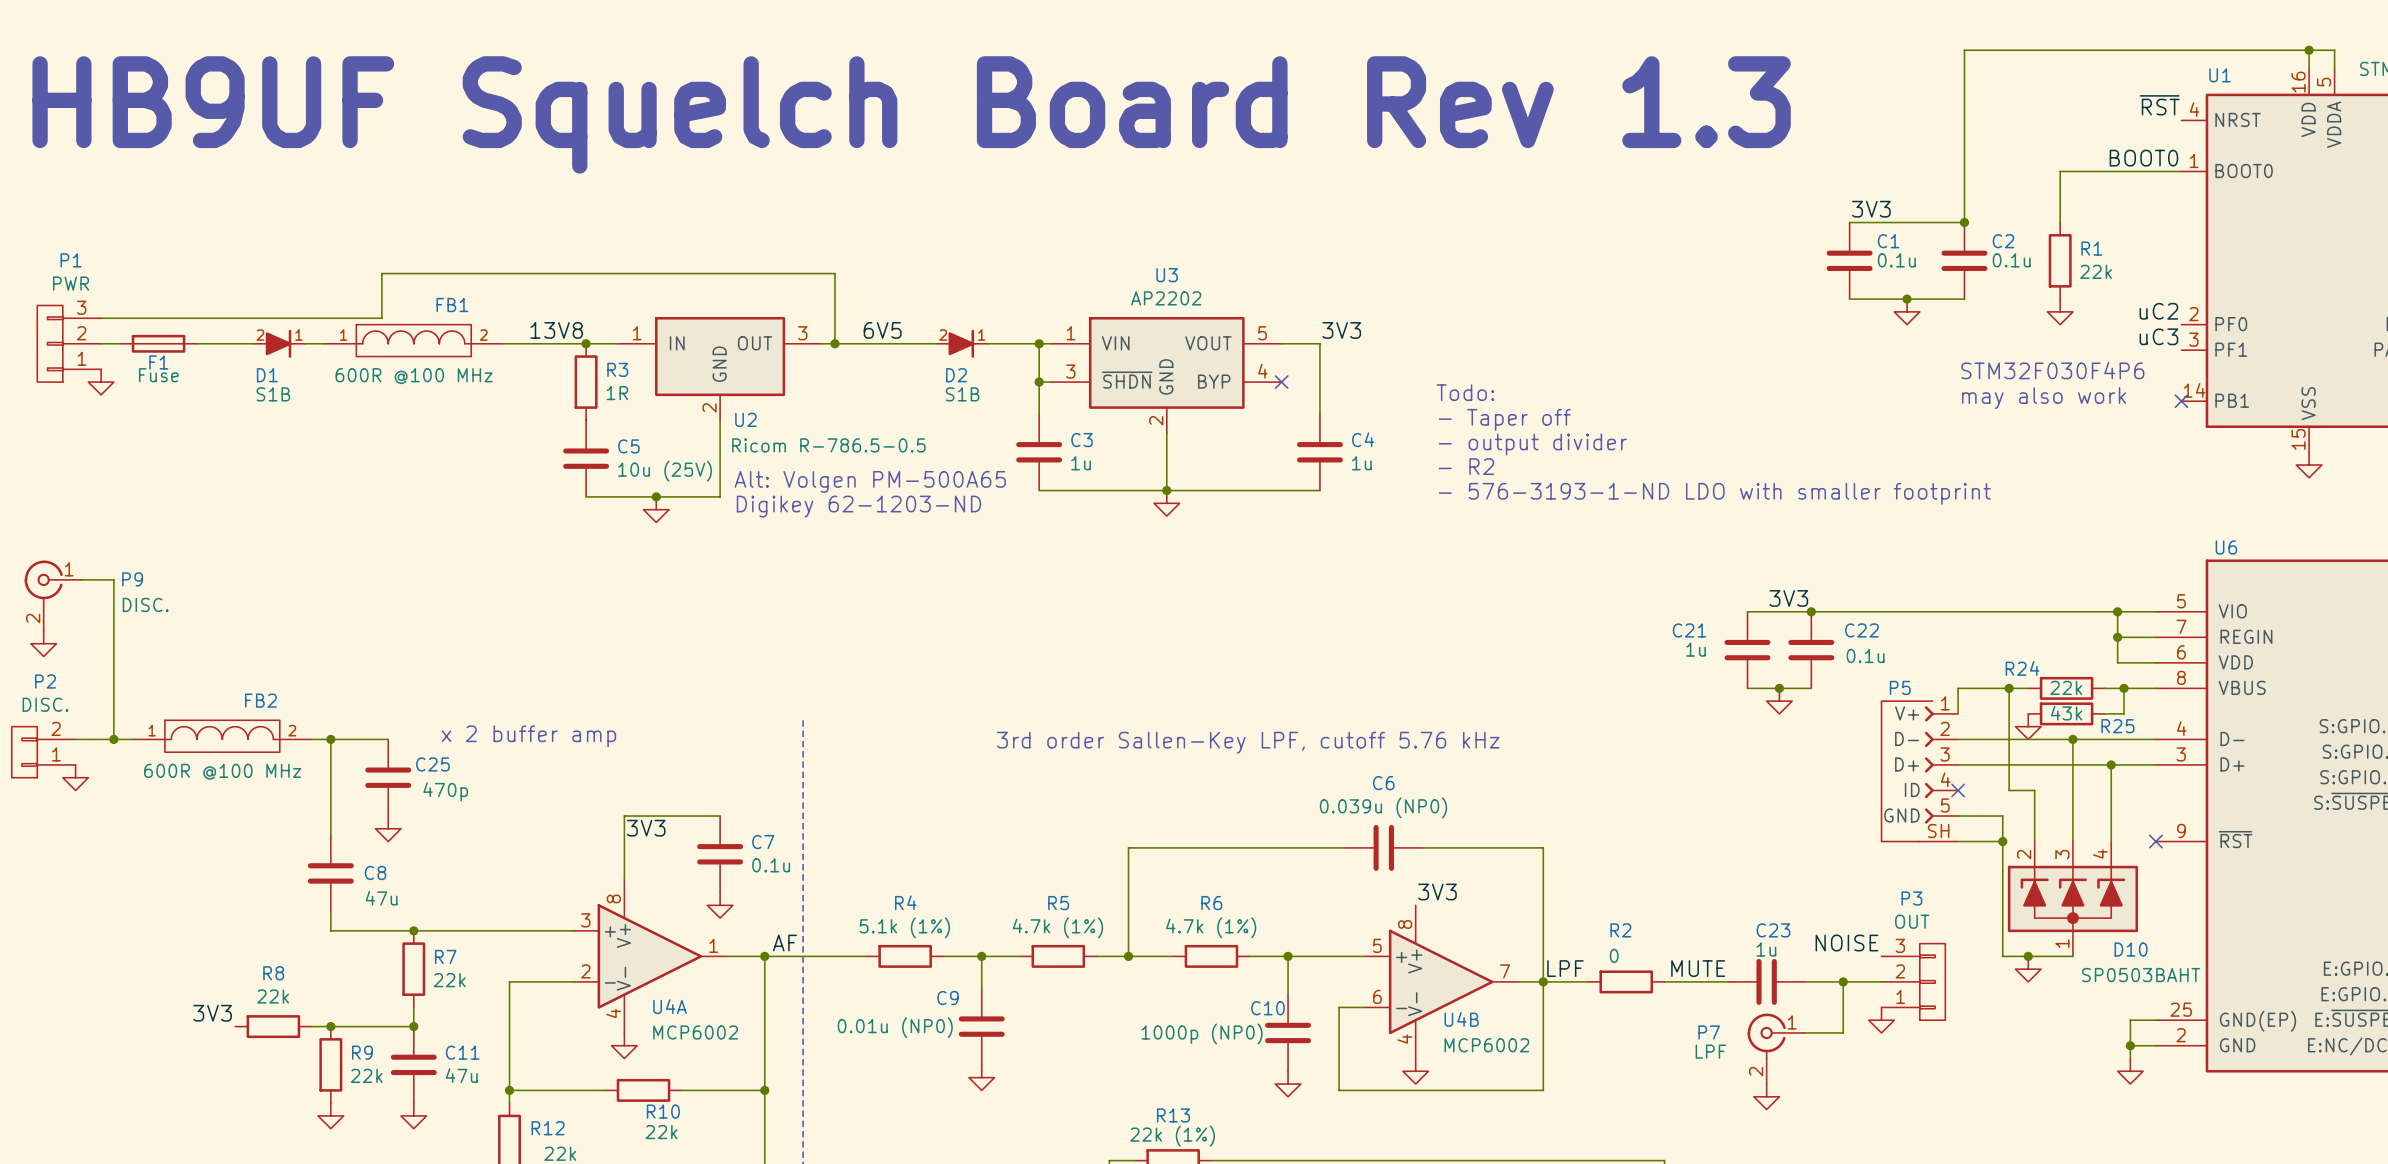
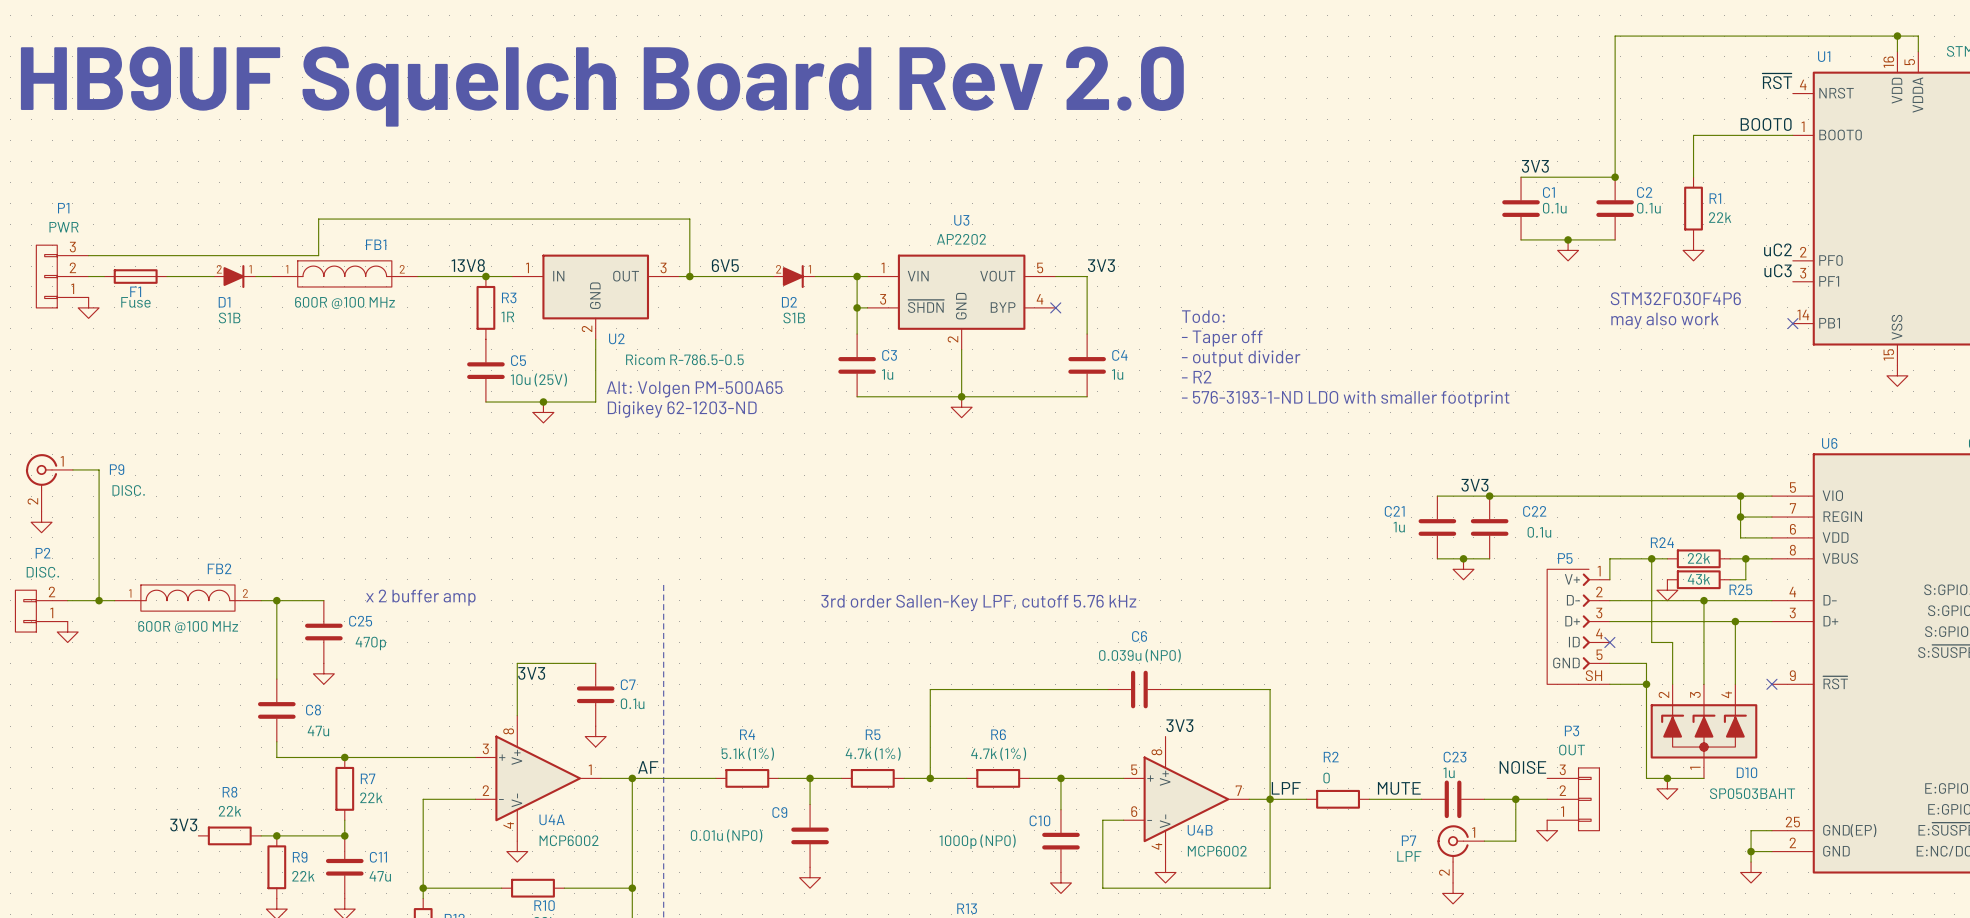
text: HB9UF Squelch Board Rev 1.3 (911, 114) -> HB9UF Squelch Board Rev 2.0 (602, 86)

